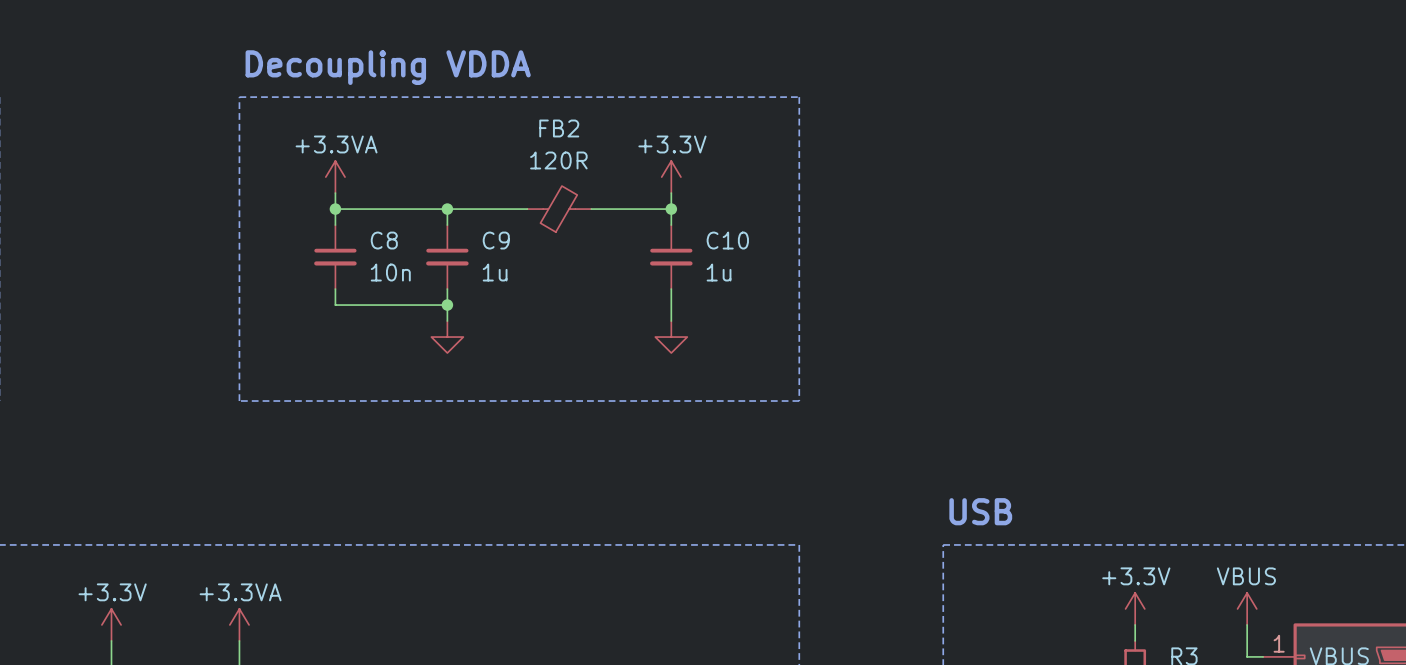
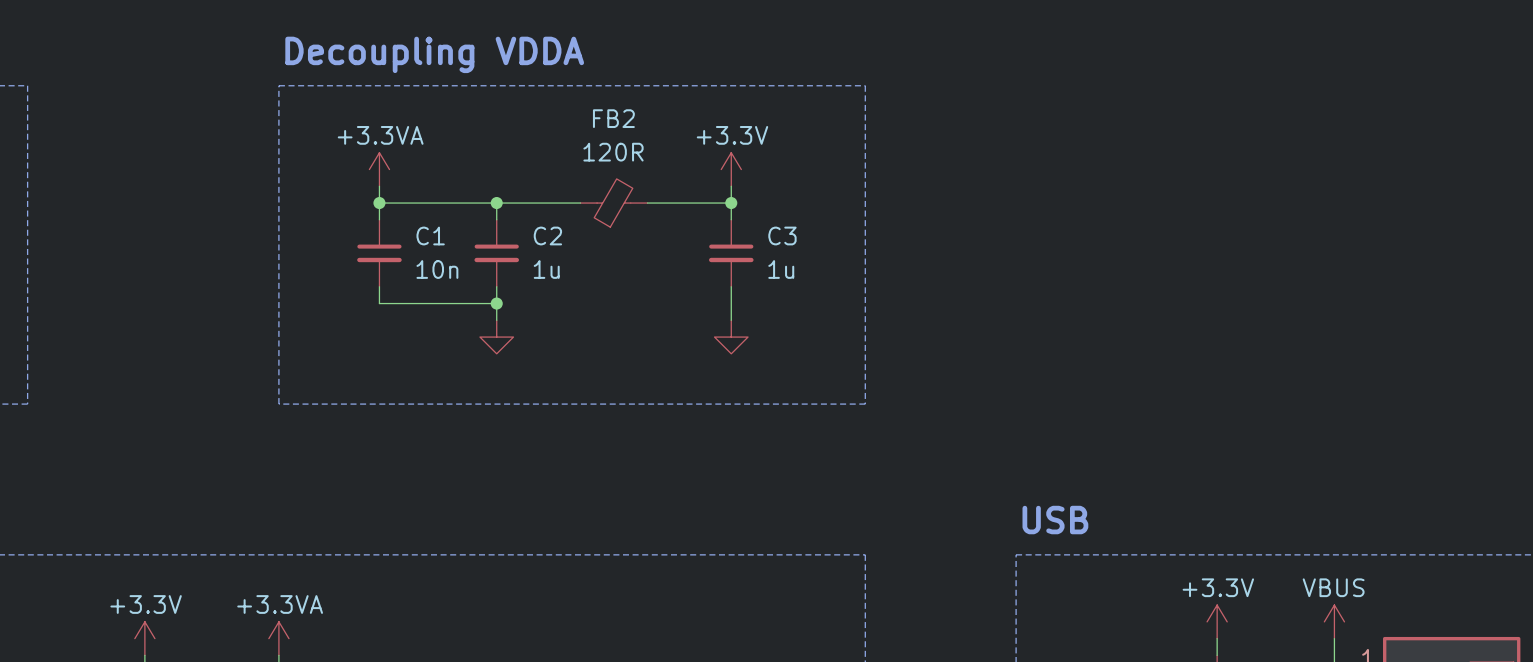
C8 name: C8 (384, 240) -> C1 (430, 235)
C9 name: C9 (496, 240) -> C2 (547, 235)
C10 name: C10 (727, 240) -> C3 (782, 235)

